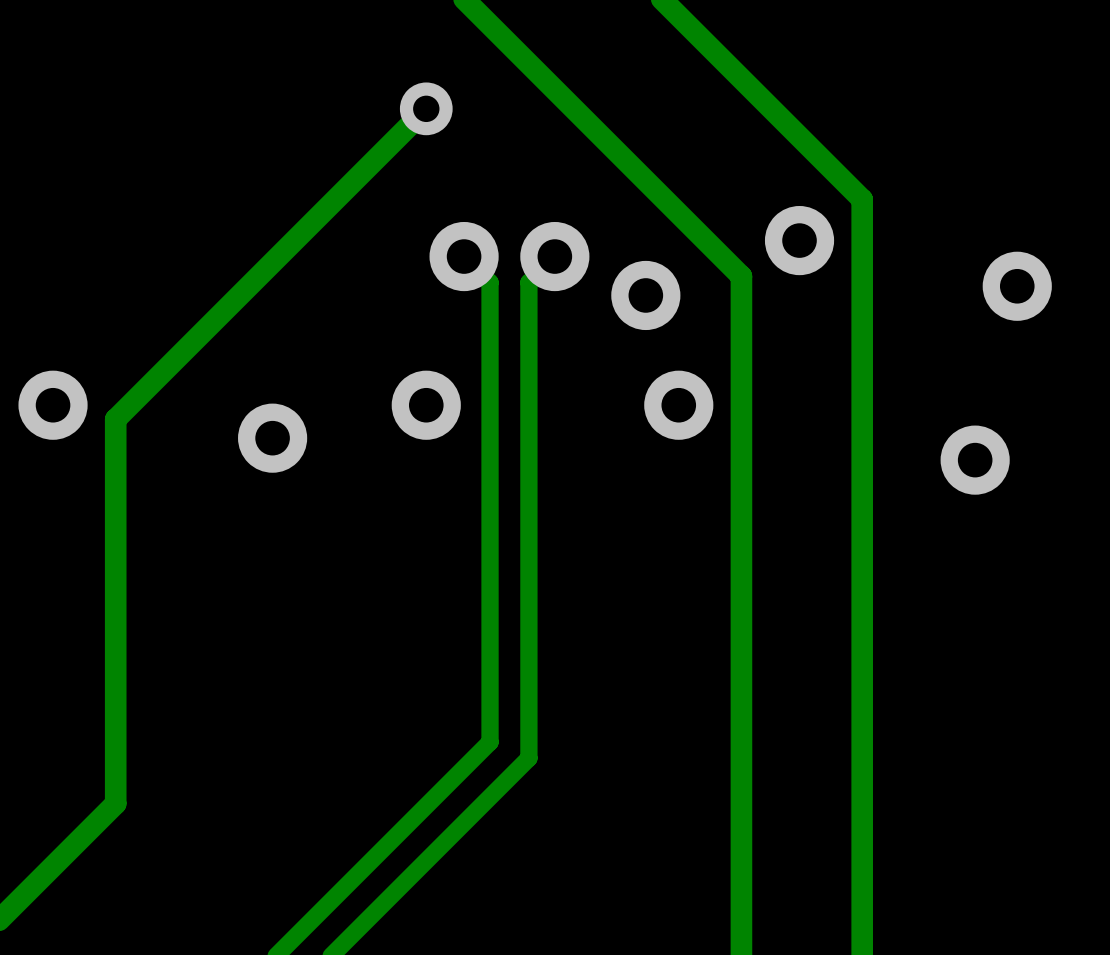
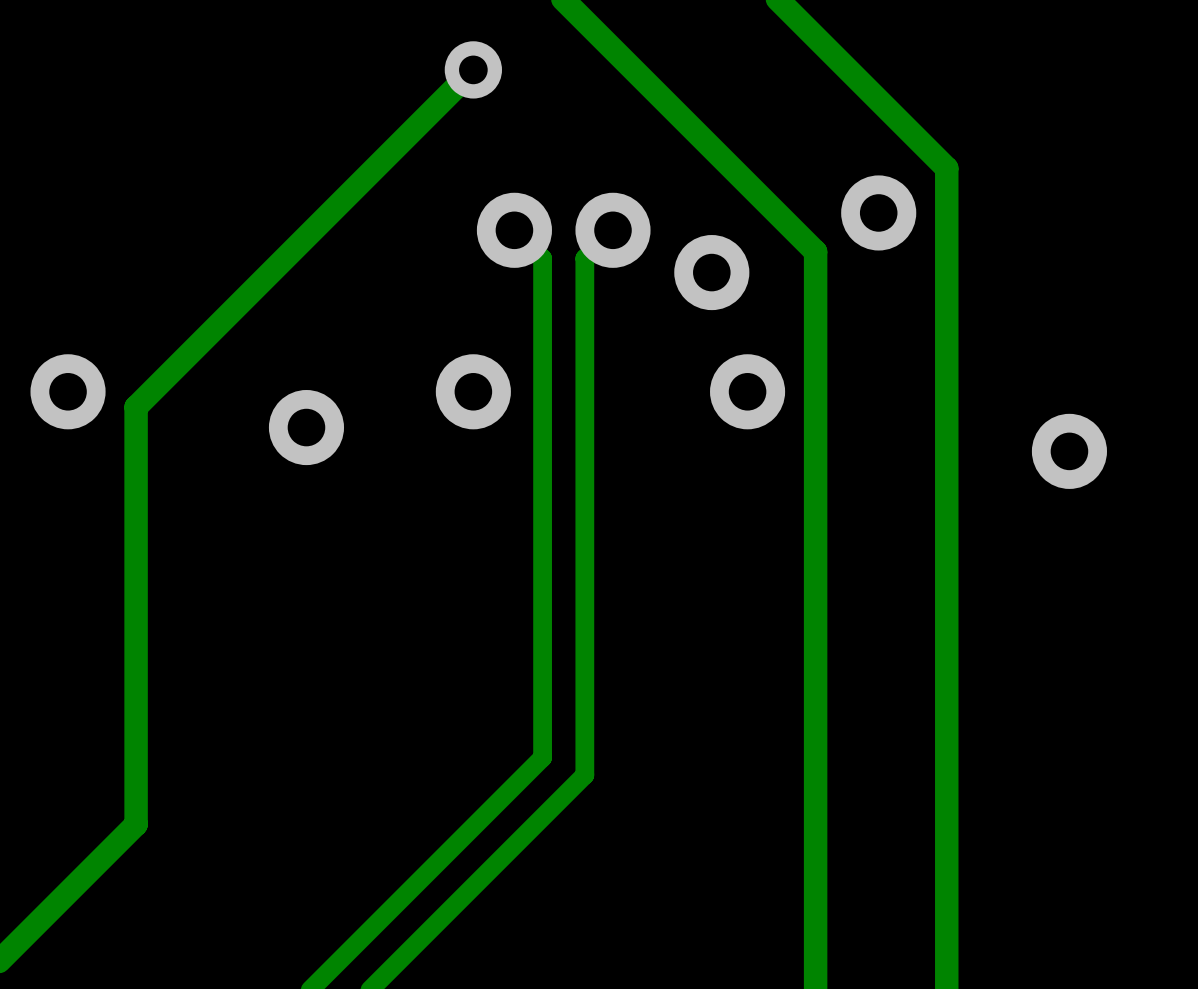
via: (1017, 286) -> none

